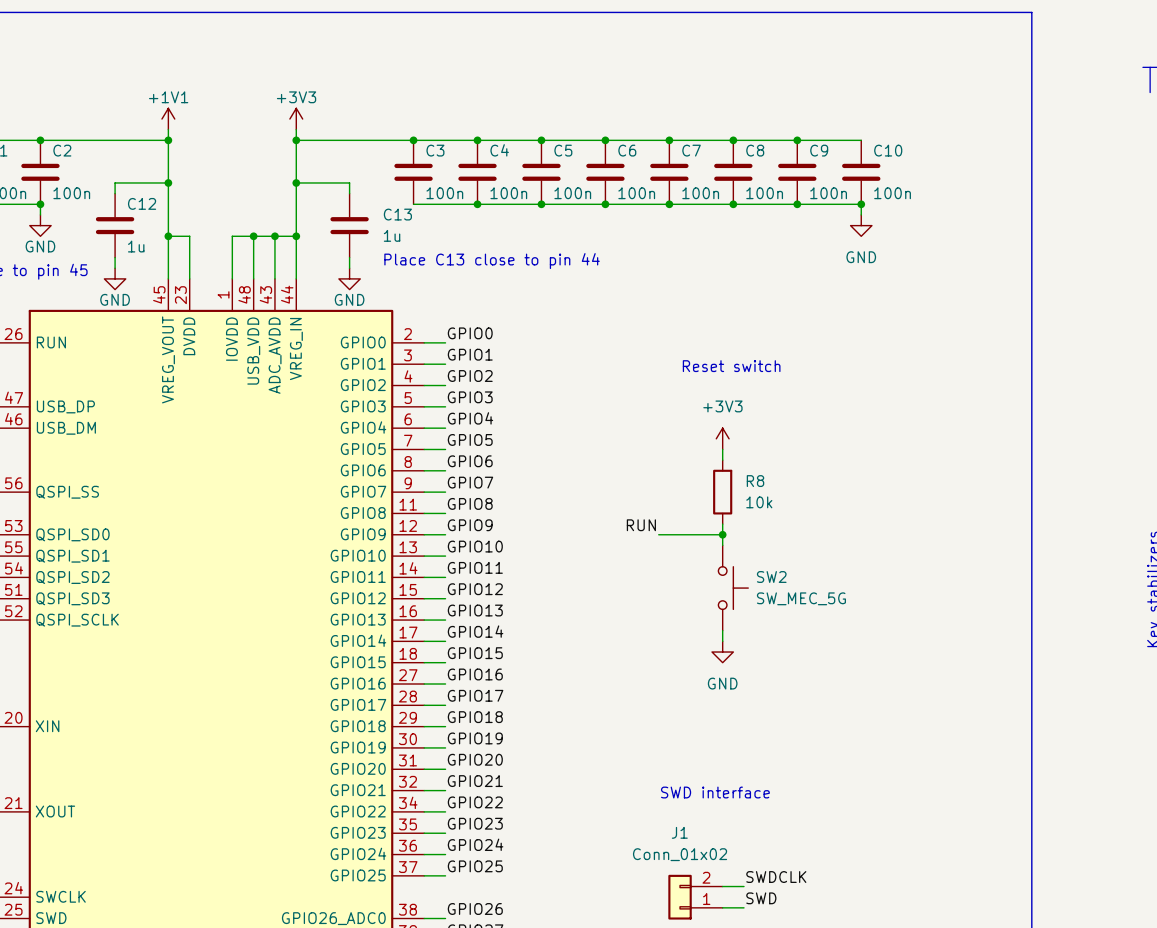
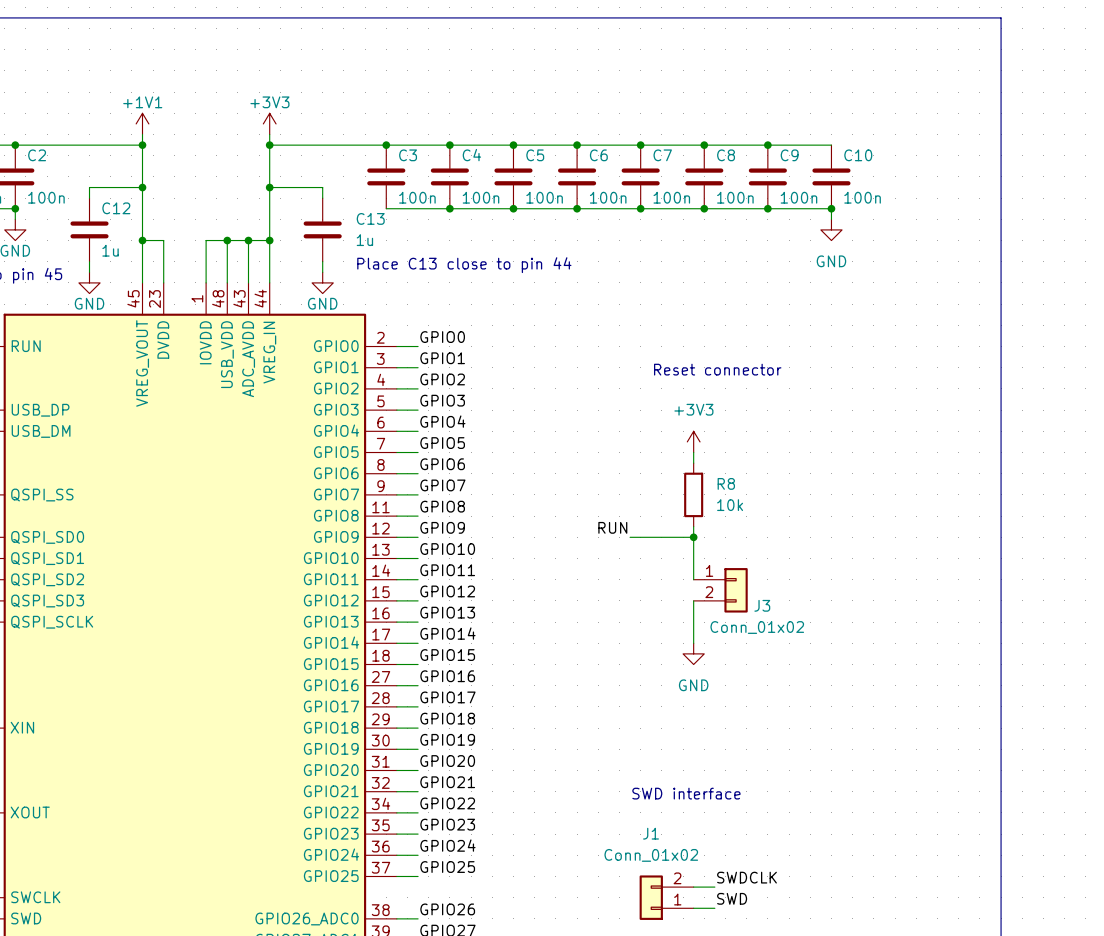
text: Reset switch (731, 366) -> Reset connector (717, 369)
SW2: SW_MEC_5G (733, 588) -> none
J3: none -> Conn_01x02 (720, 590)

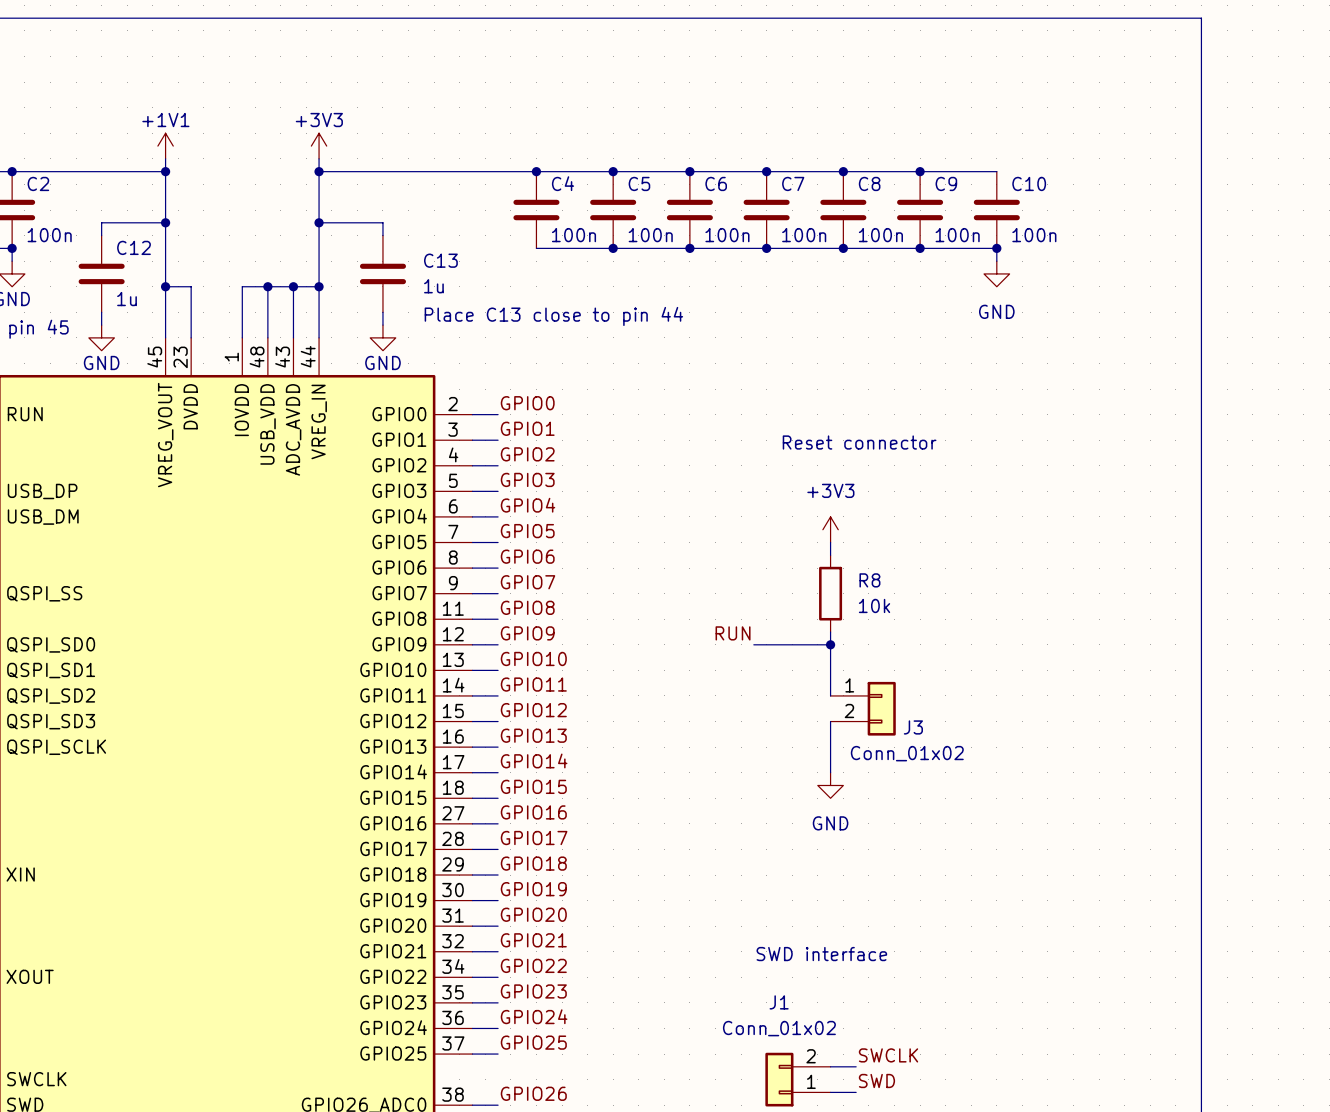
junction: (386, 145) -> none
C3: 100n (386, 176) -> none
wire: (386, 208) (449, 208) -> none
junction: (449, 208) -> none
label: SWDCLK (746, 877) -> SWCLK (888, 1055)

